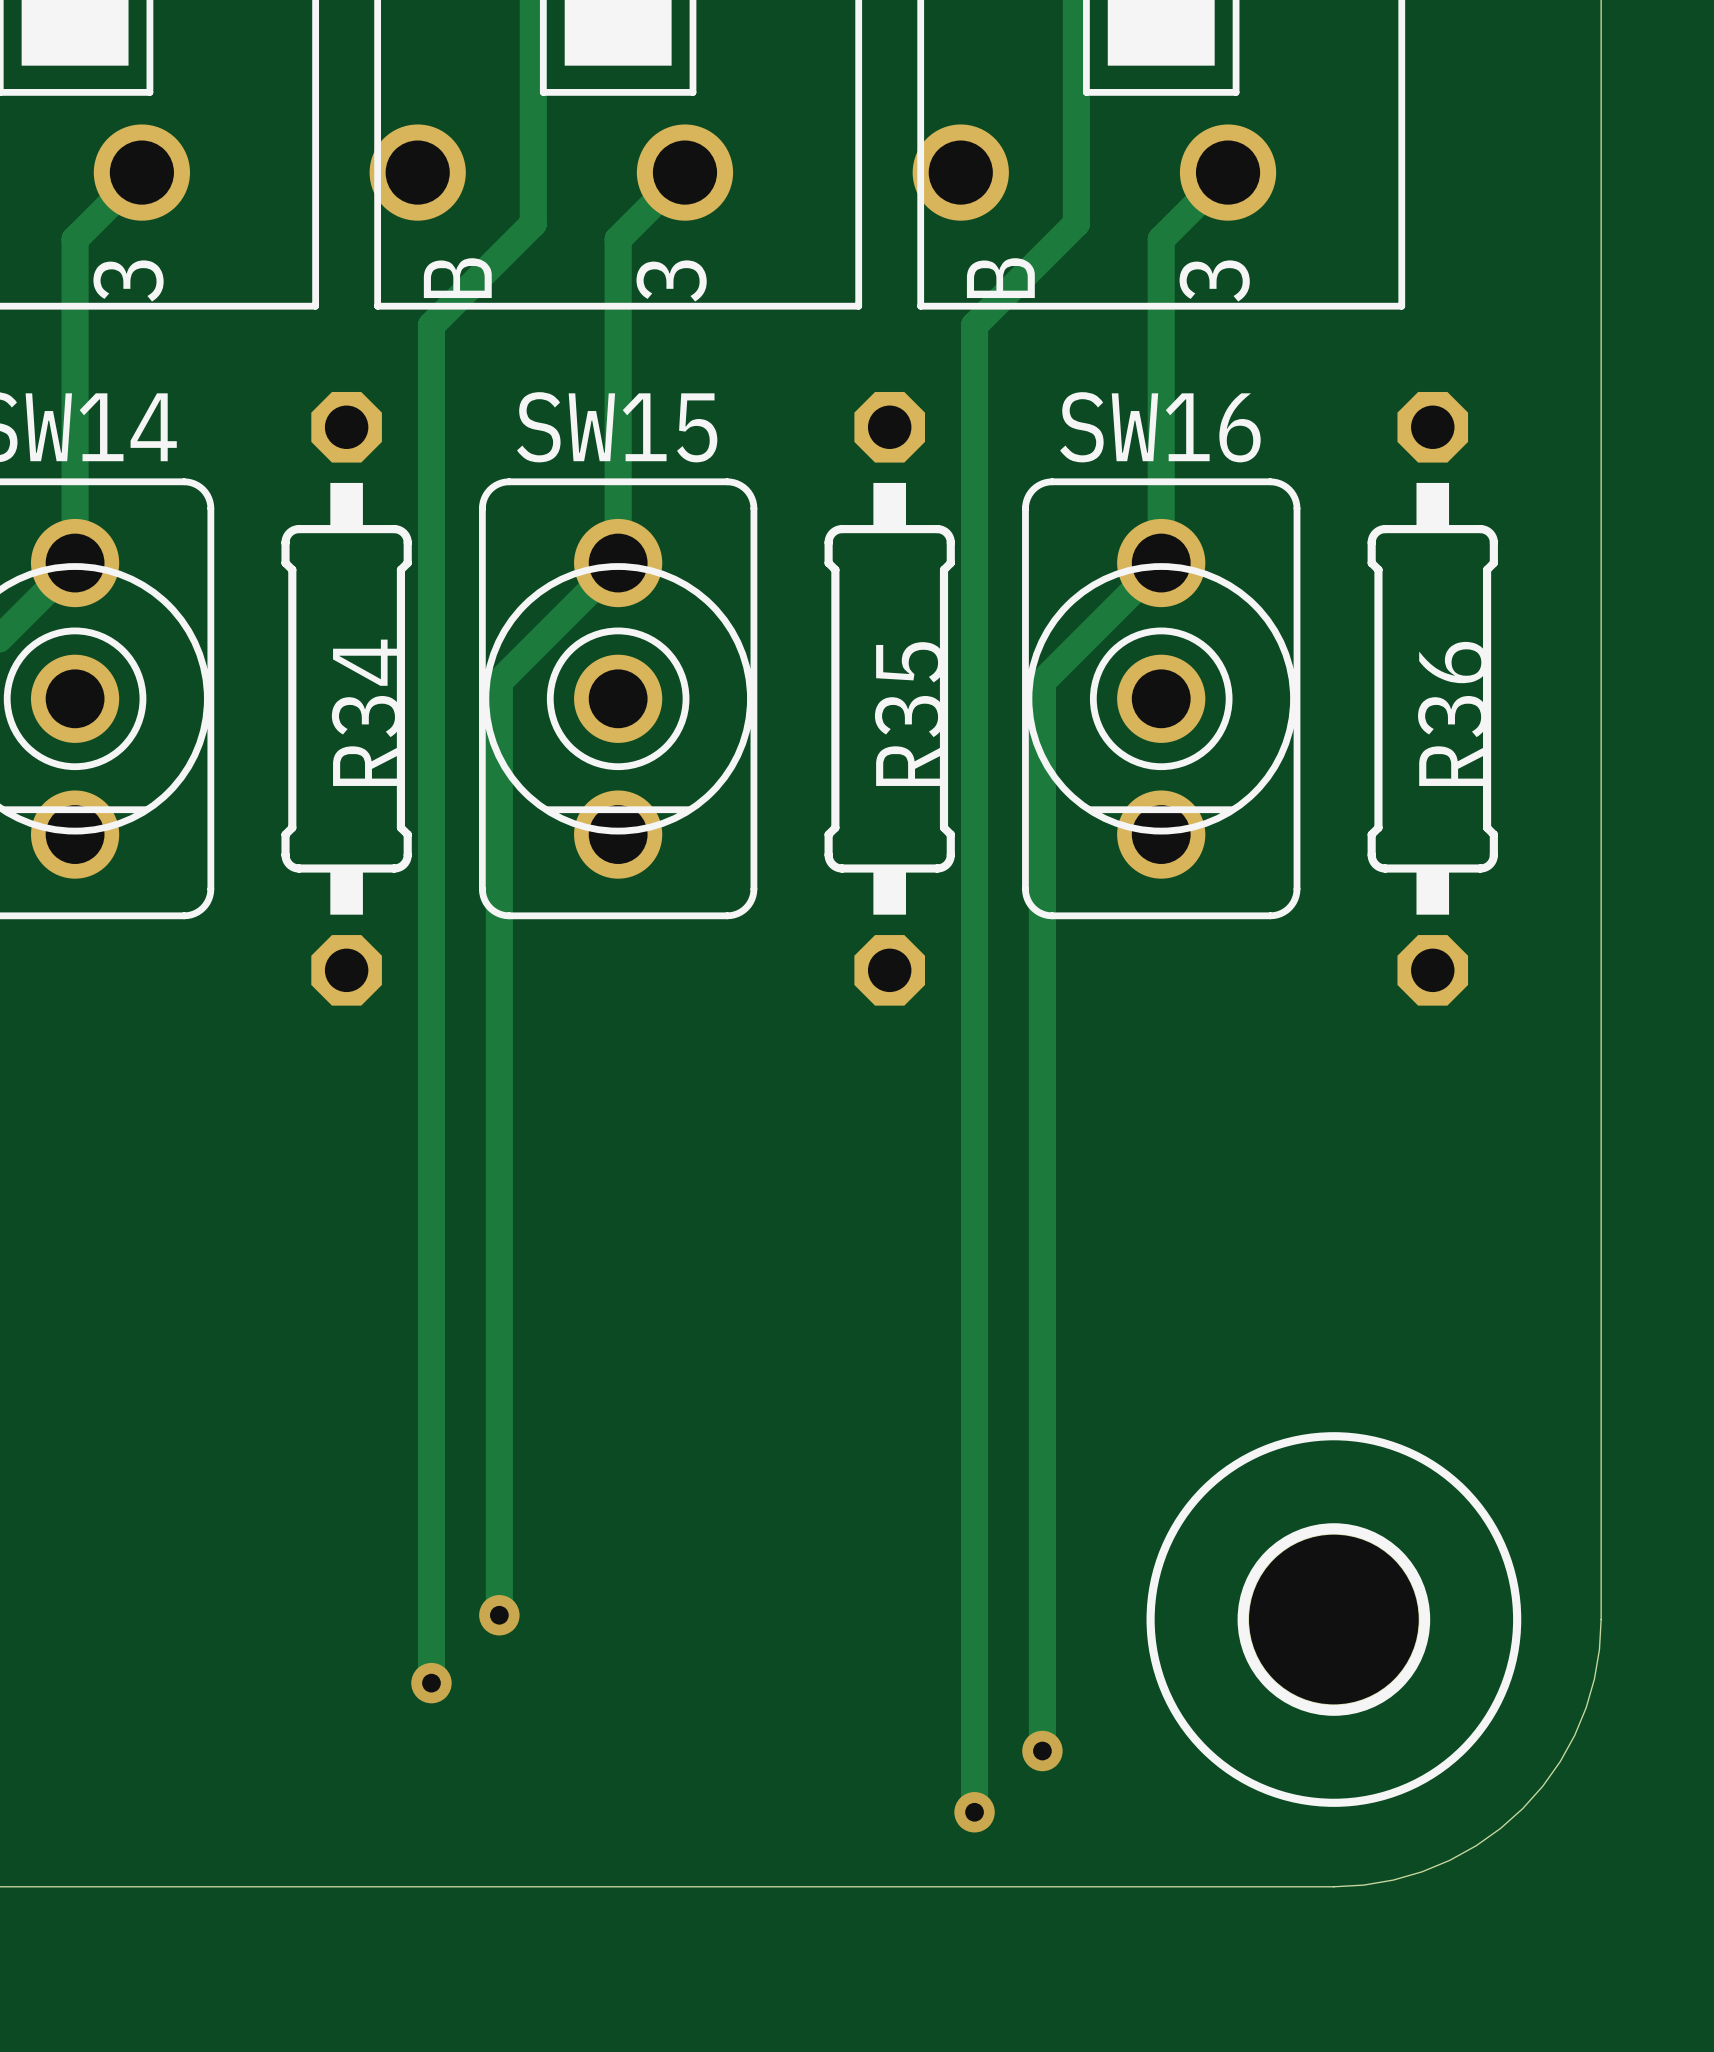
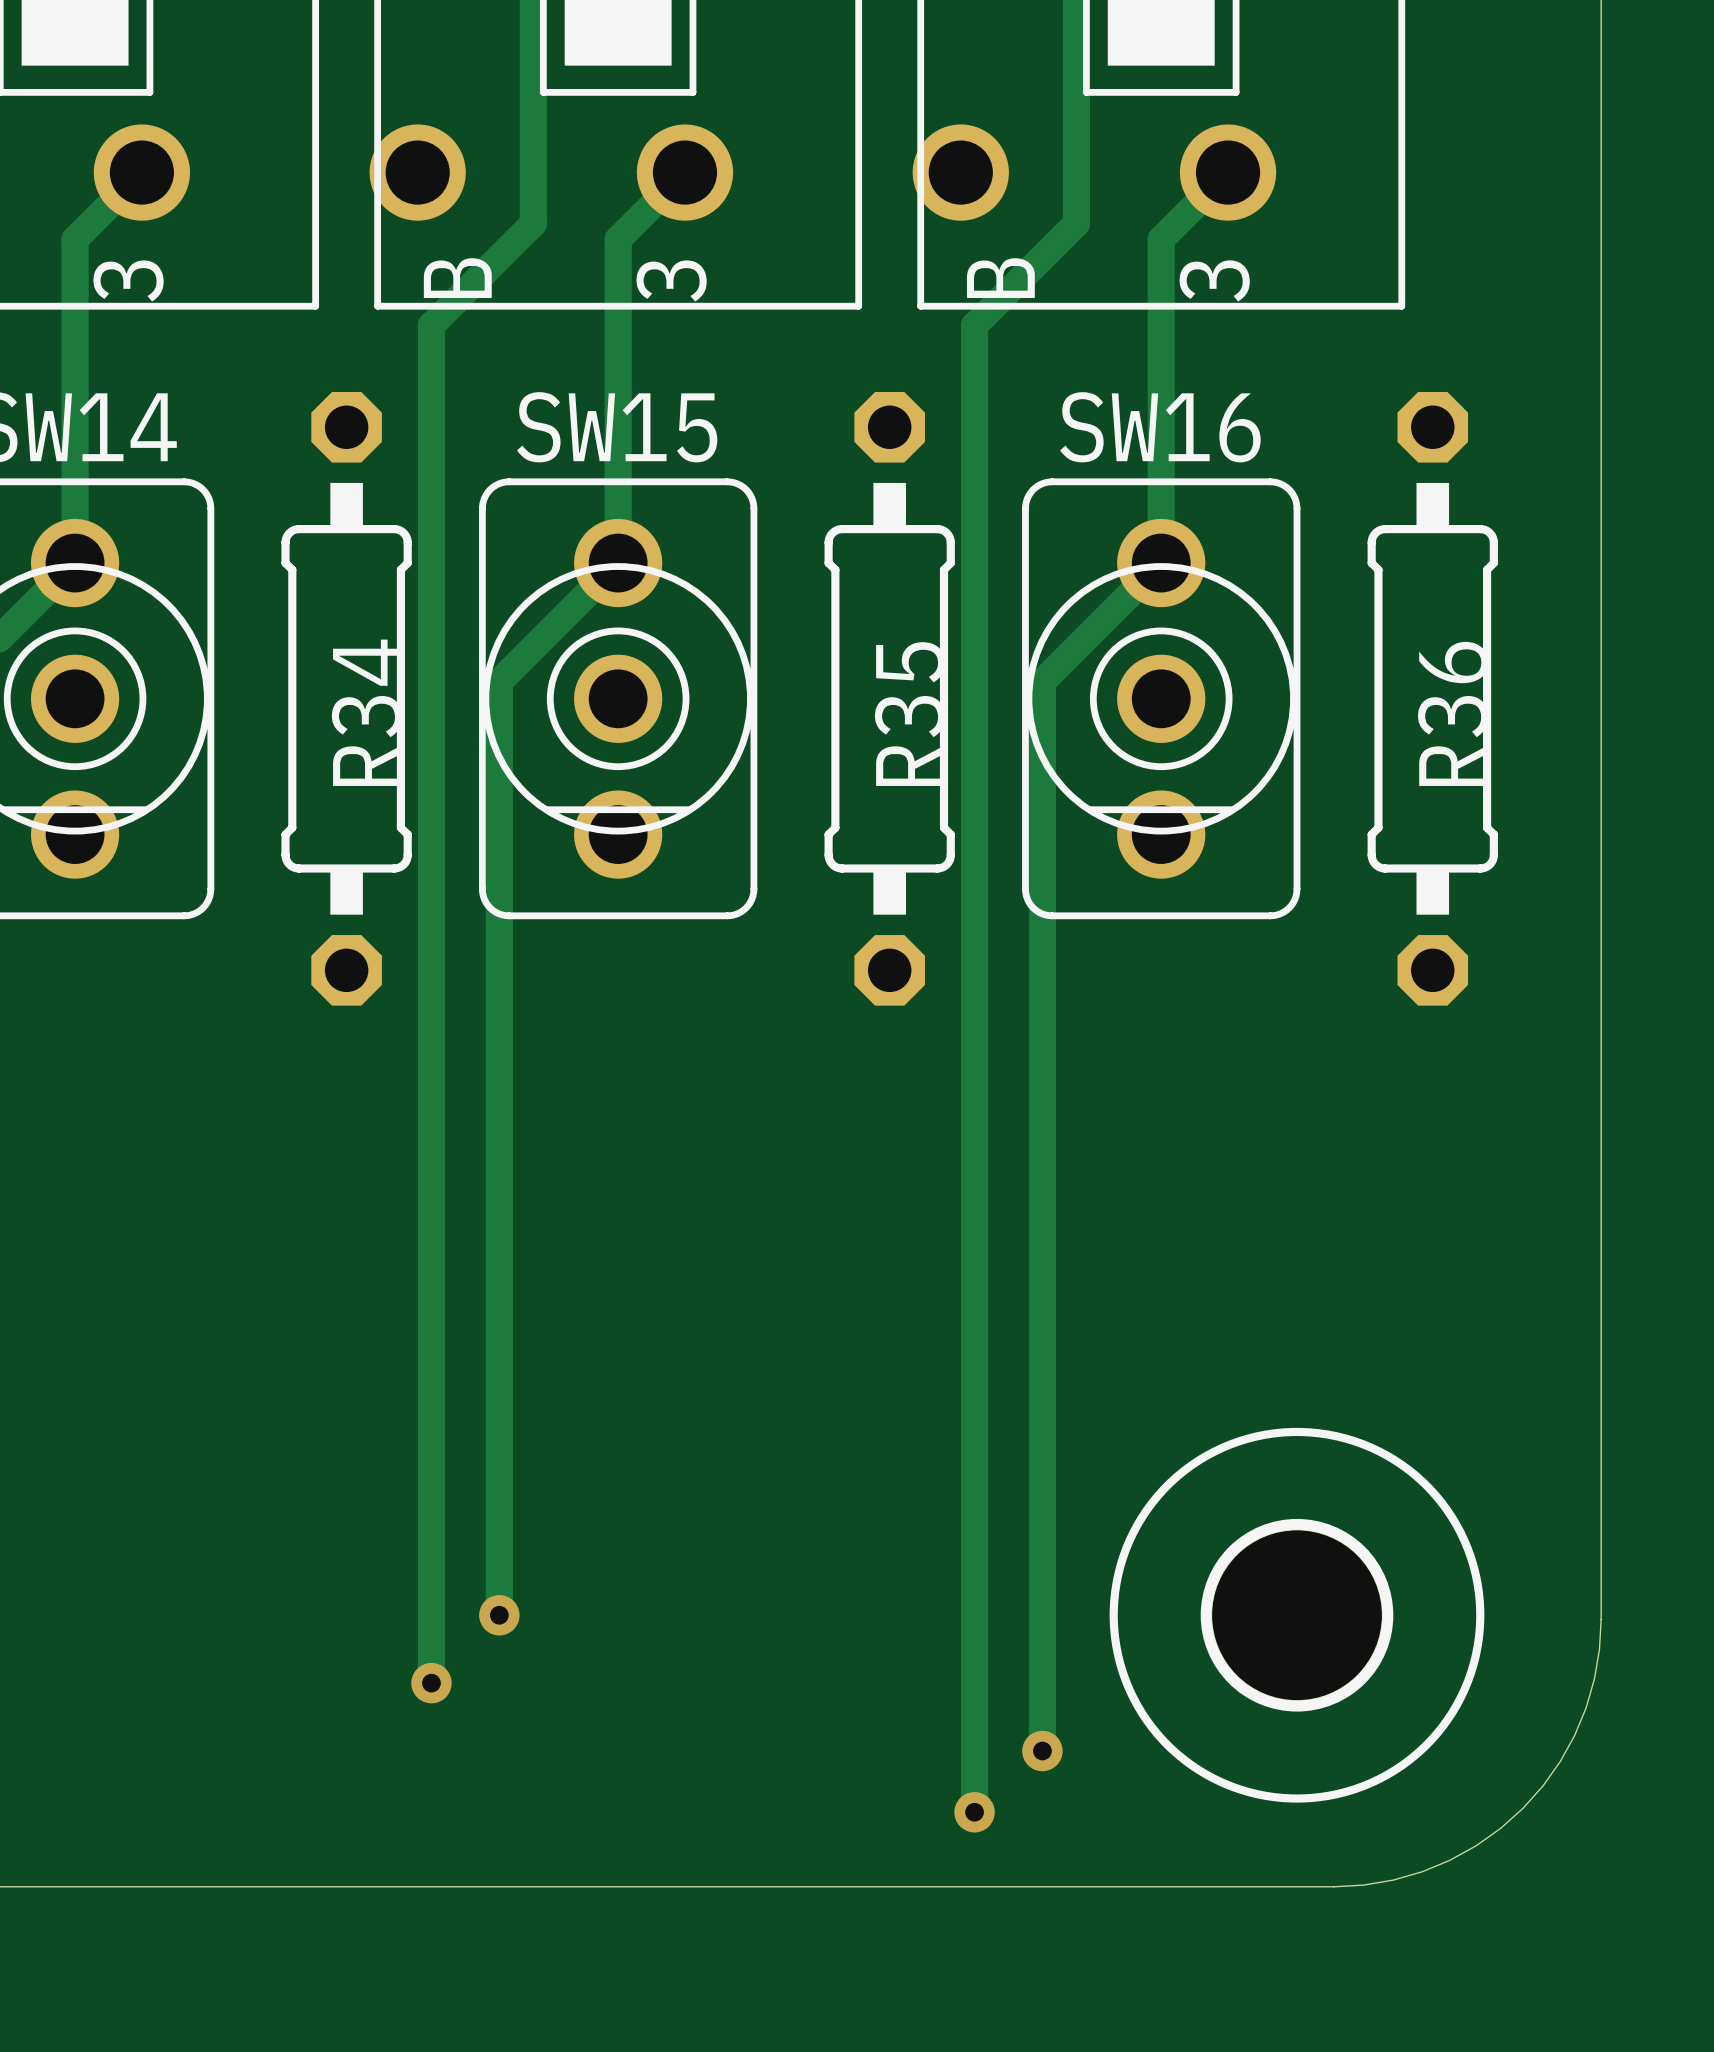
part position: (1333, 1619) -> (1297, 1615)

